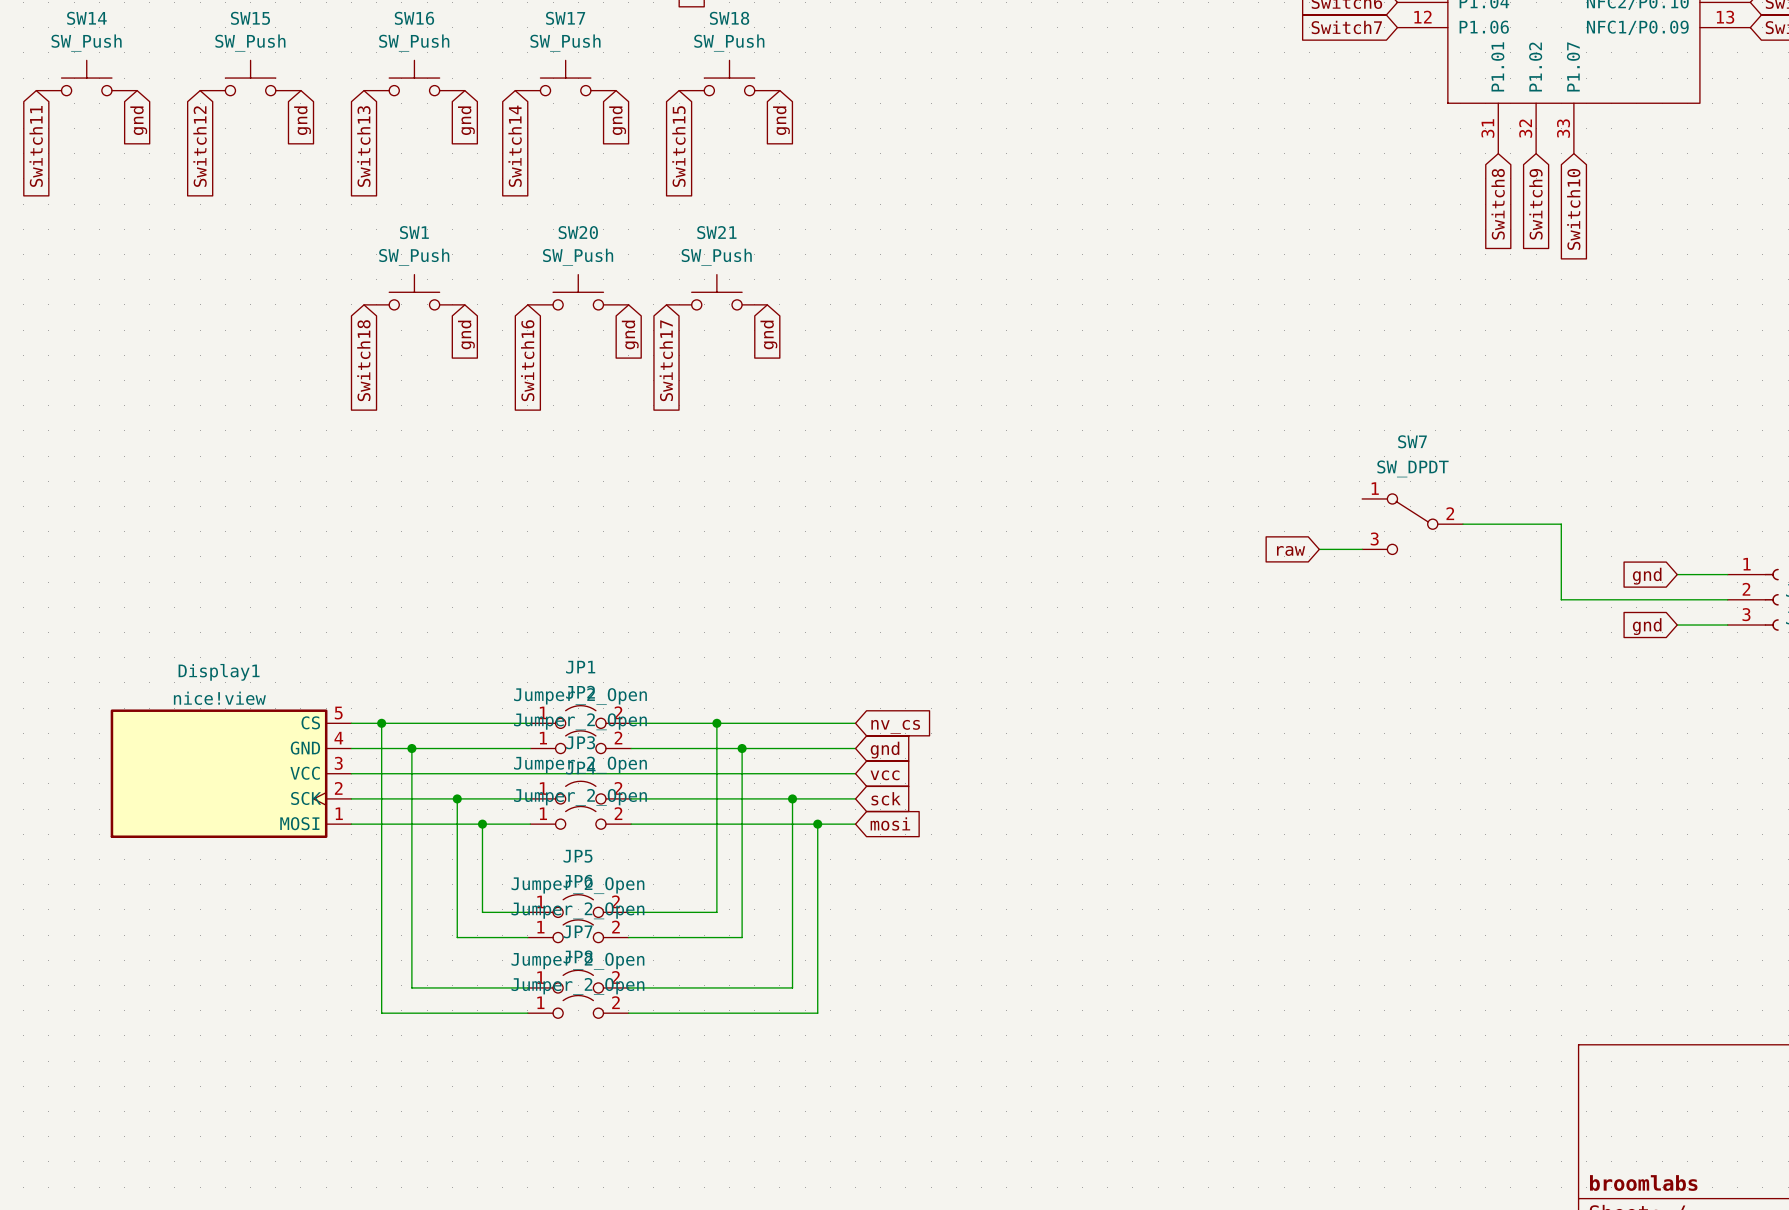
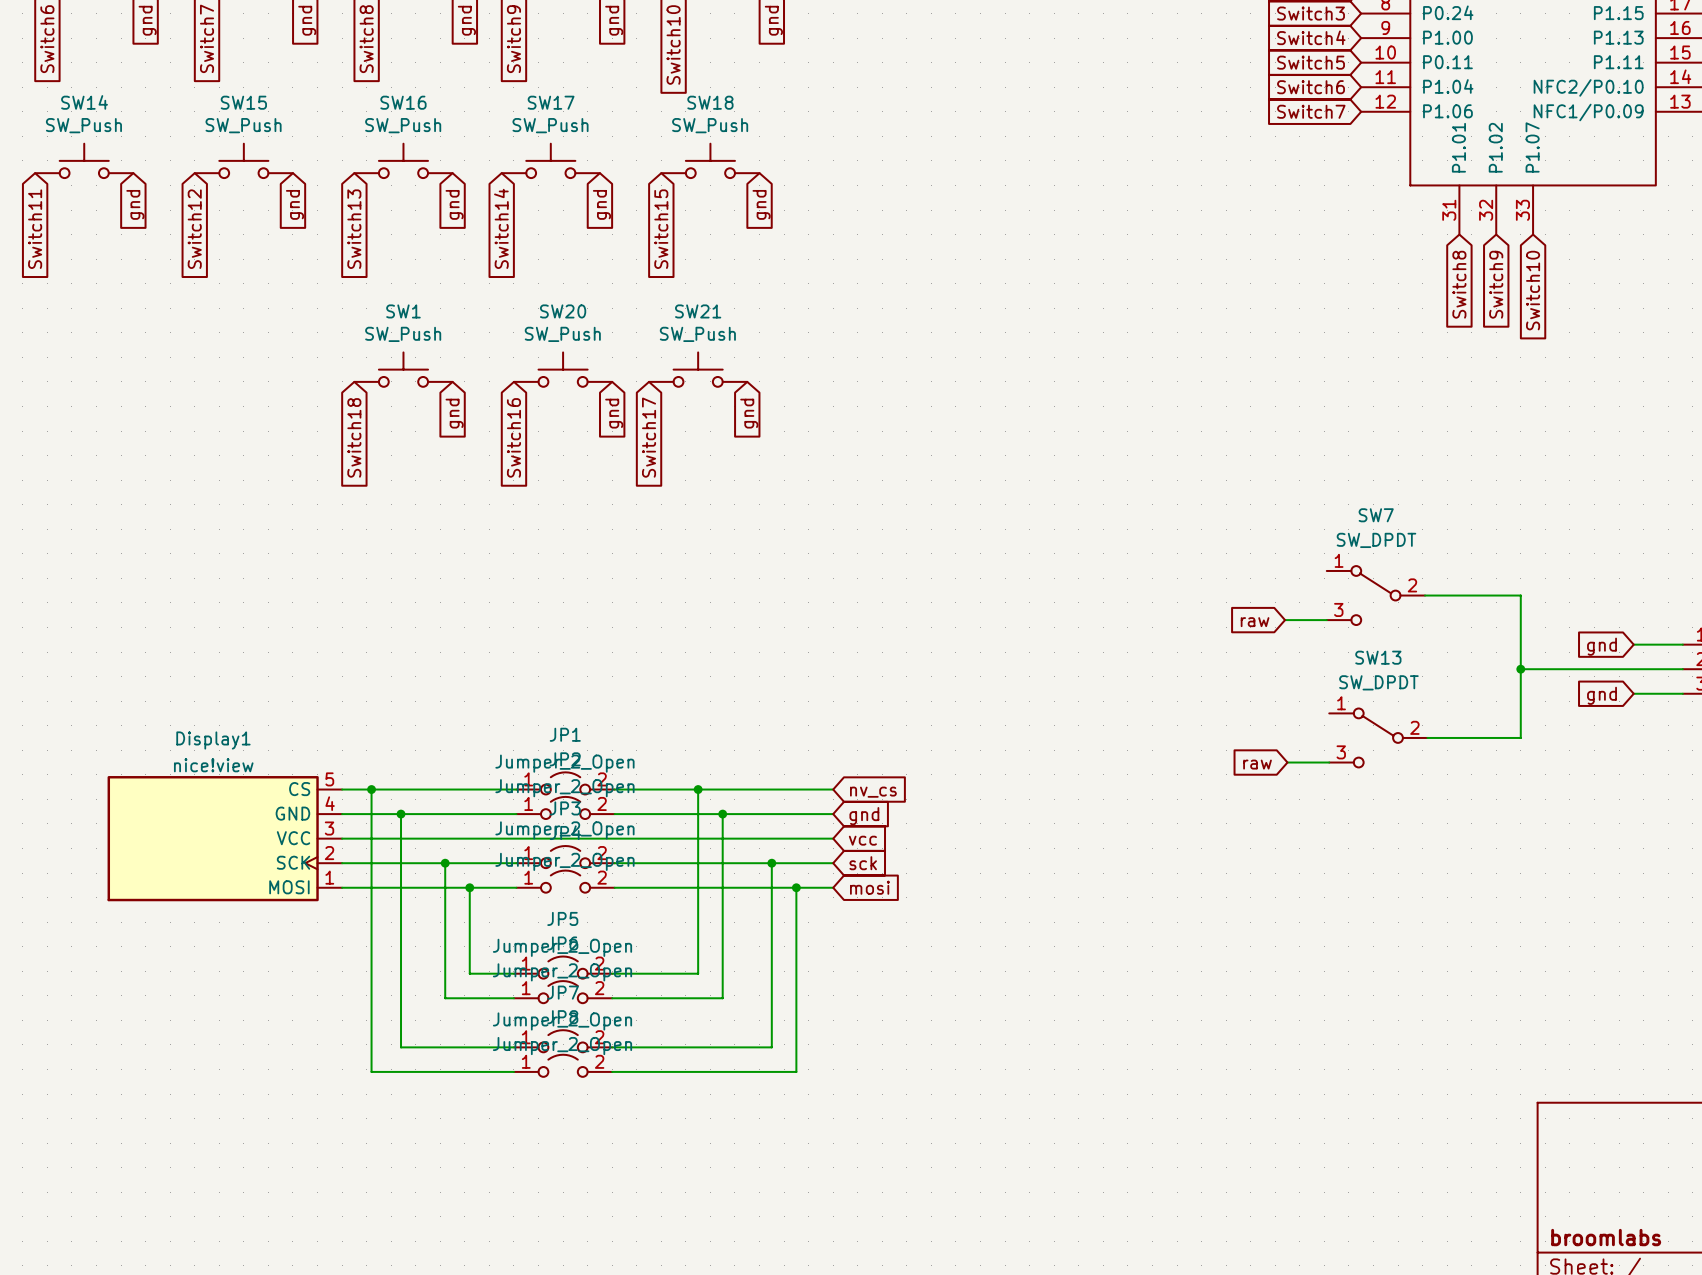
wire: none -> (1520, 669) (1520, 737) (1427, 737)
junction: none -> (1520, 669)
SW13: none -> SW_DPDT (1378, 737)
wire: none -> (1287, 762) (1329, 762)
global label: none -> raw (1257, 764)

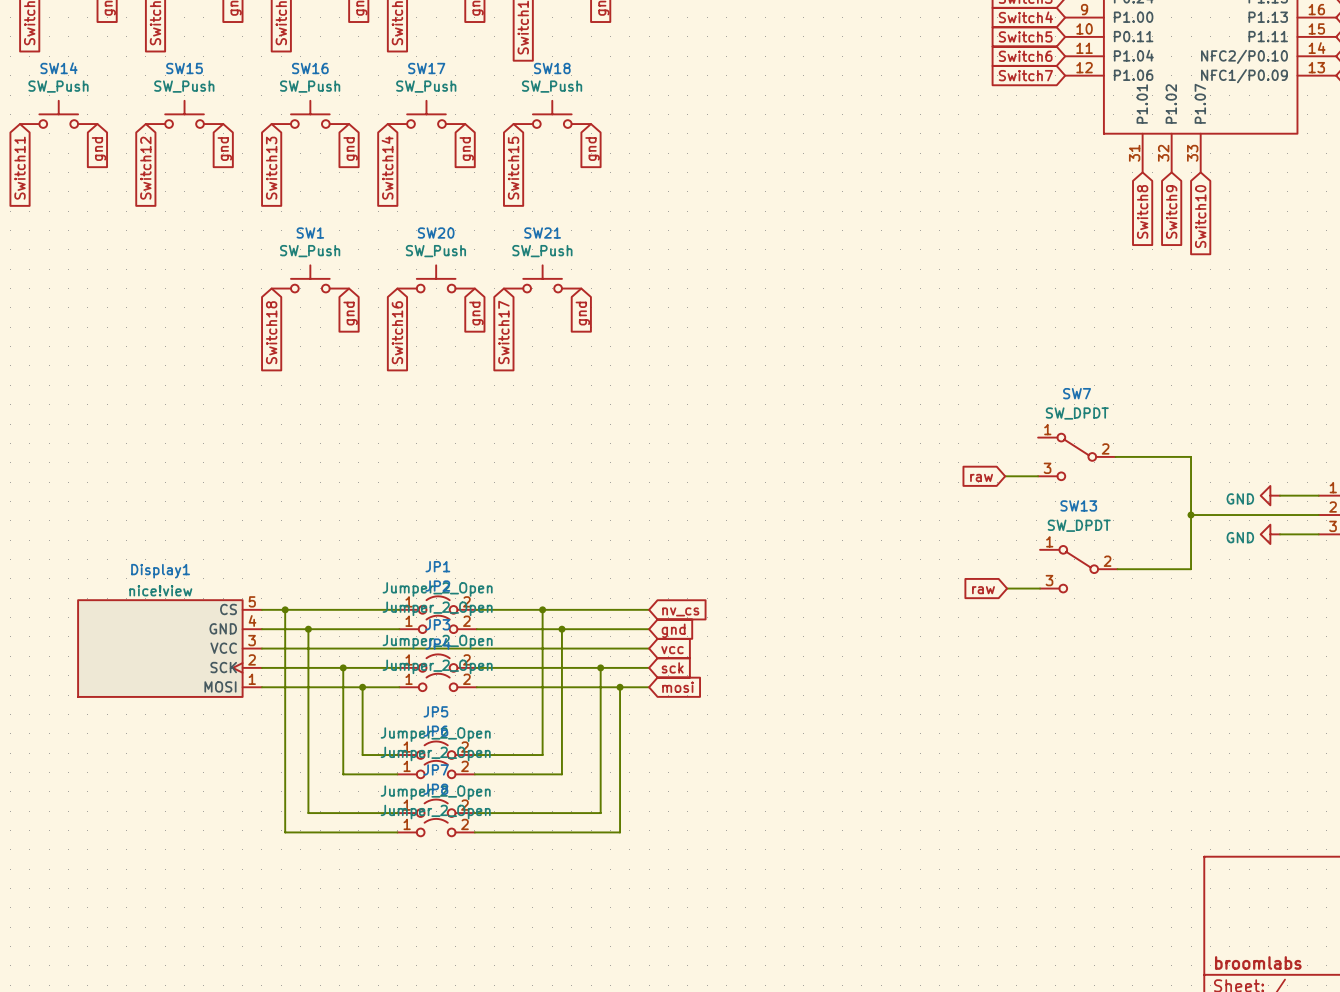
power symbol: none -> GND (1270, 495)
global label: gnd (1602, 646) -> none
power symbol: none -> GND (1270, 534)
global label: gnd (1602, 695) -> none

